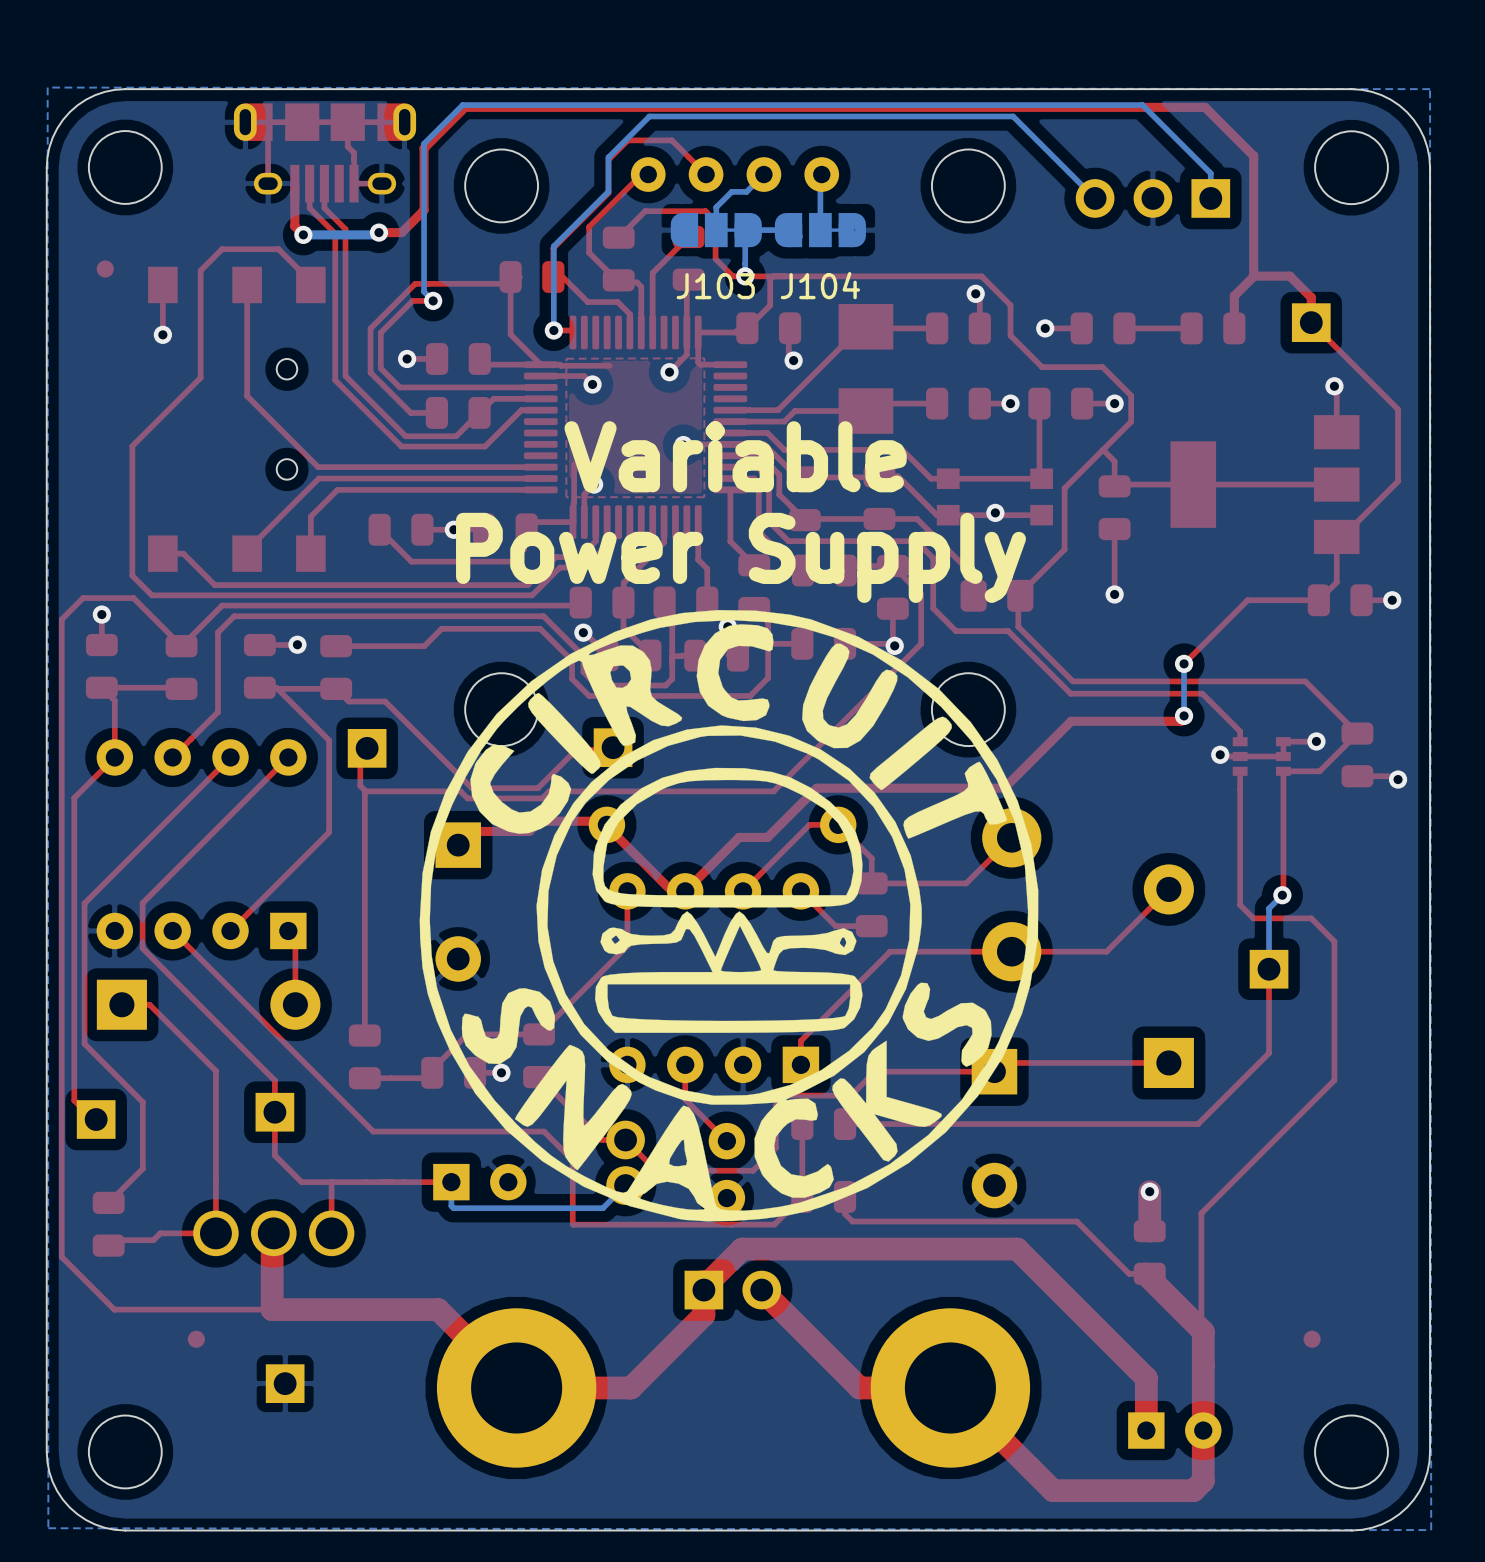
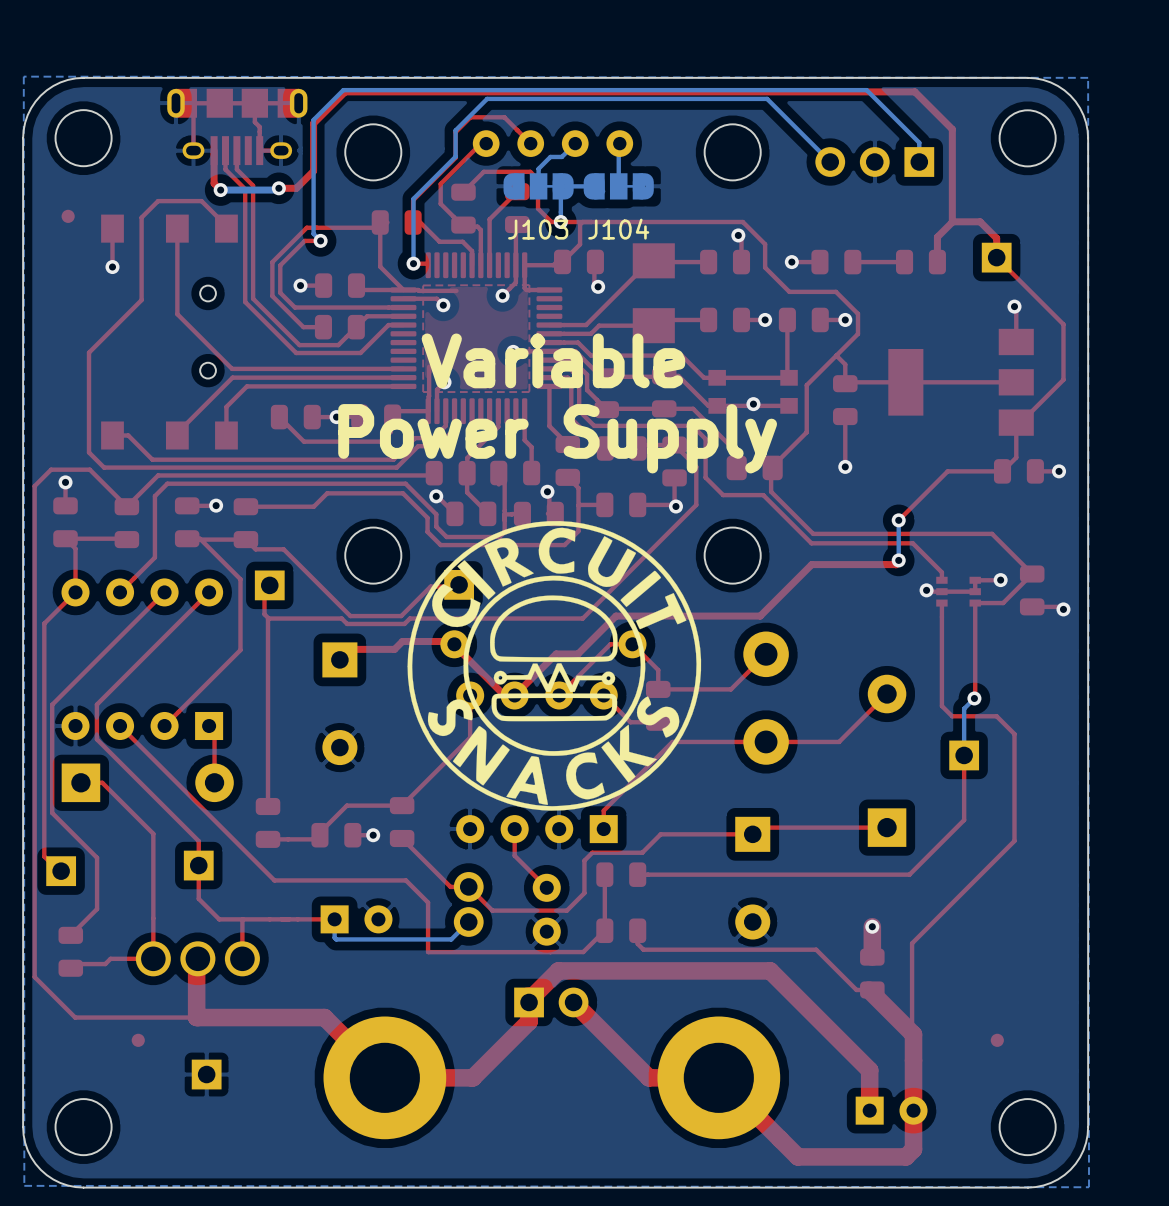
drawing: [419, 610, 1039, 1222] -> none
drawing: none -> [407, 521, 702, 811]

